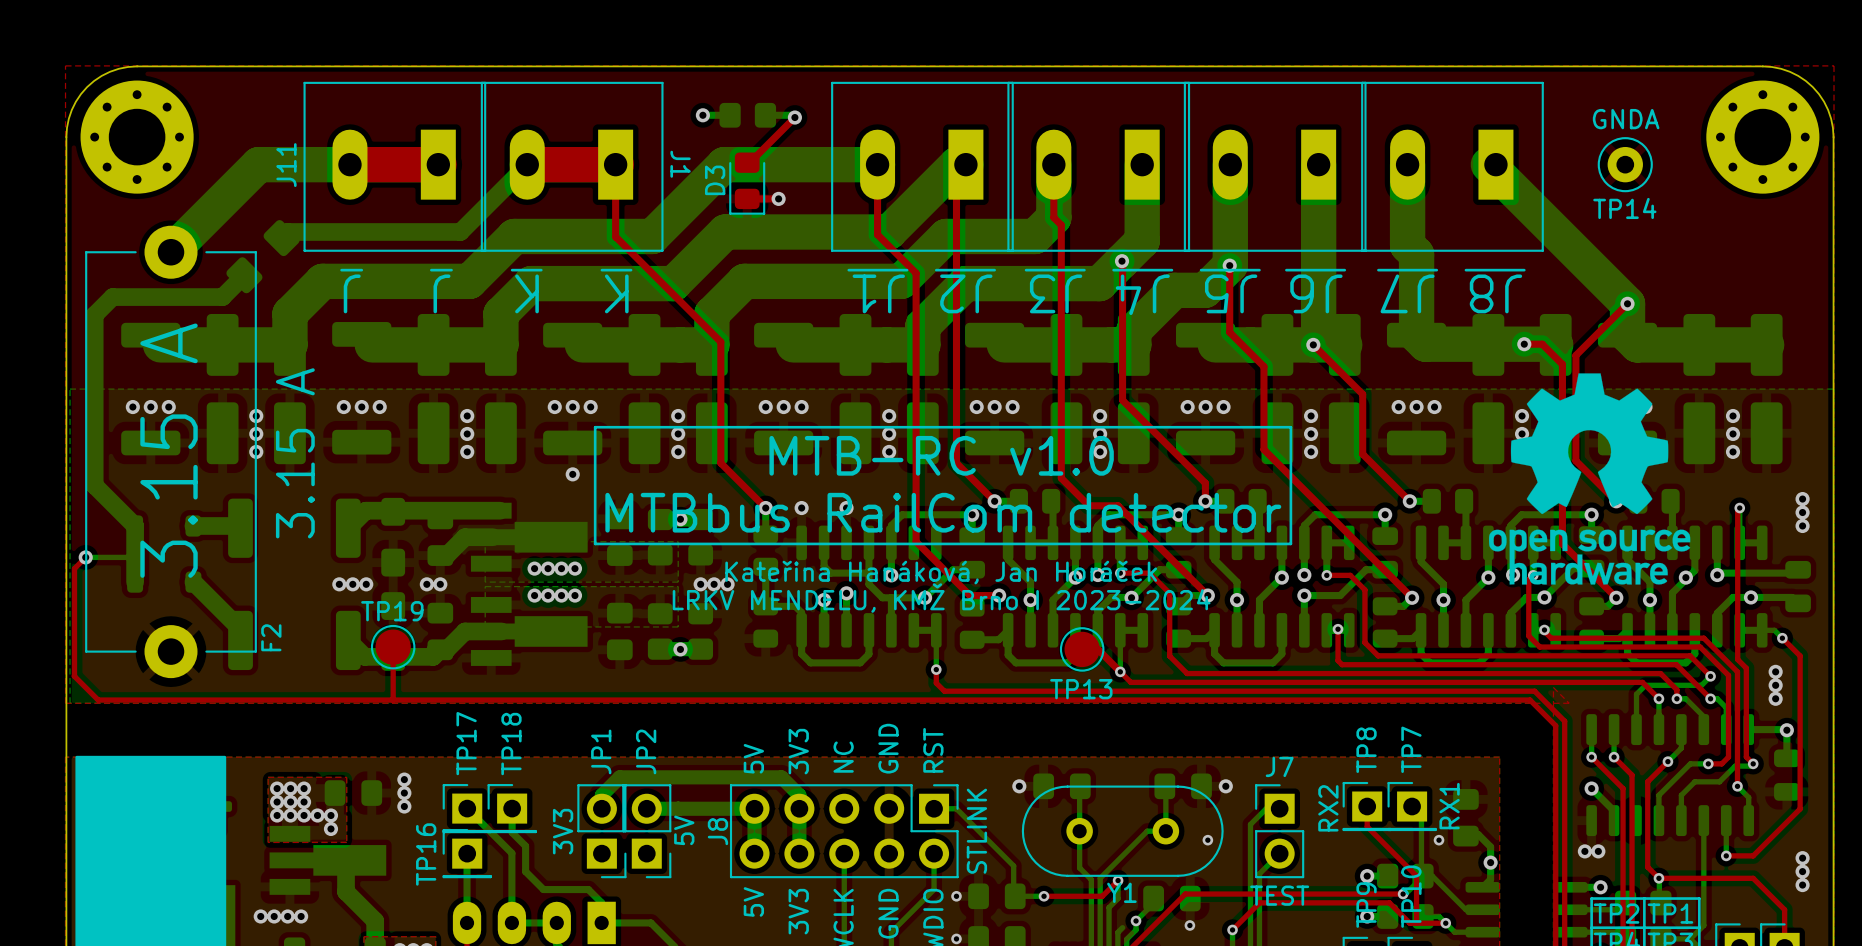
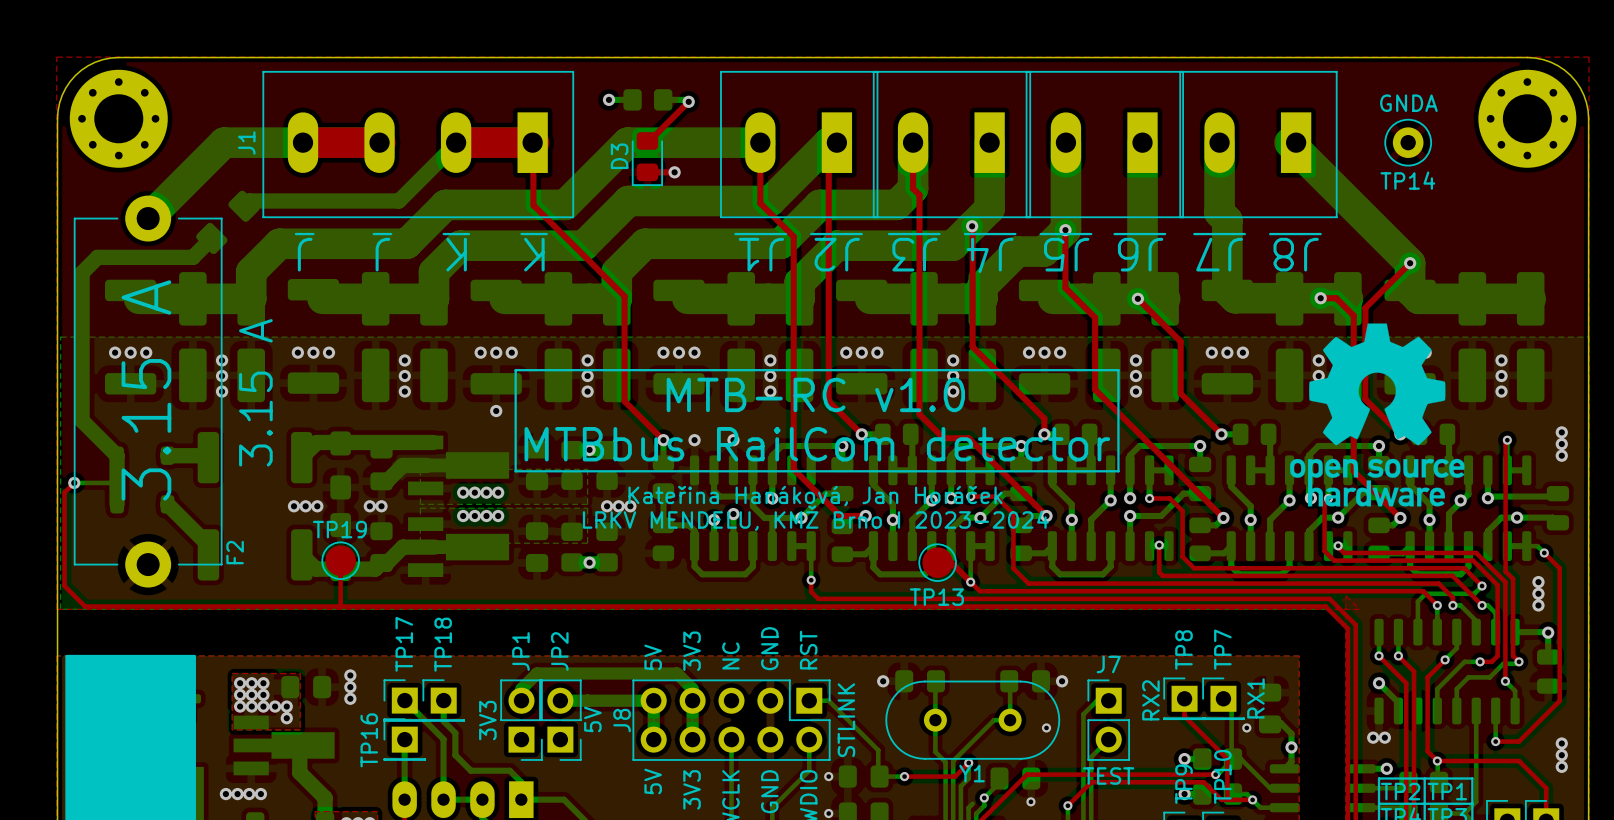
J1 footprint: [480, 81, 664, 252] -> [262, 70, 575, 219]
J1 name position: J1 (680, 164) -> J1 (246, 143)
J11: (394, 166) -> none

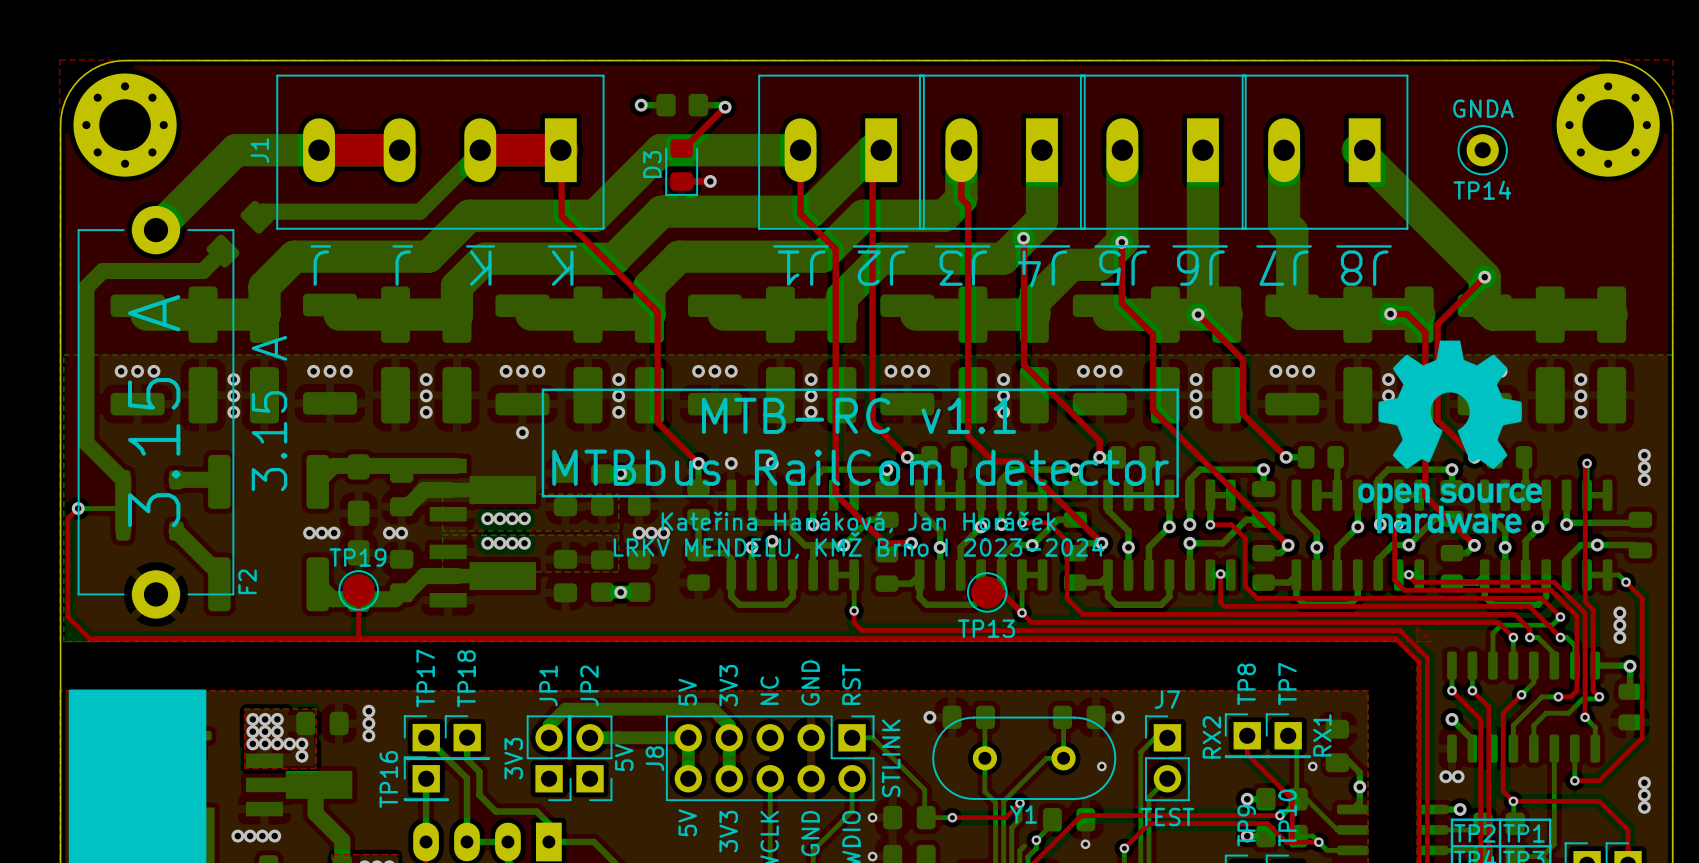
text: MTB-RC v1.0 (815, 394) -> MTB-RC v1.1 (859, 415)

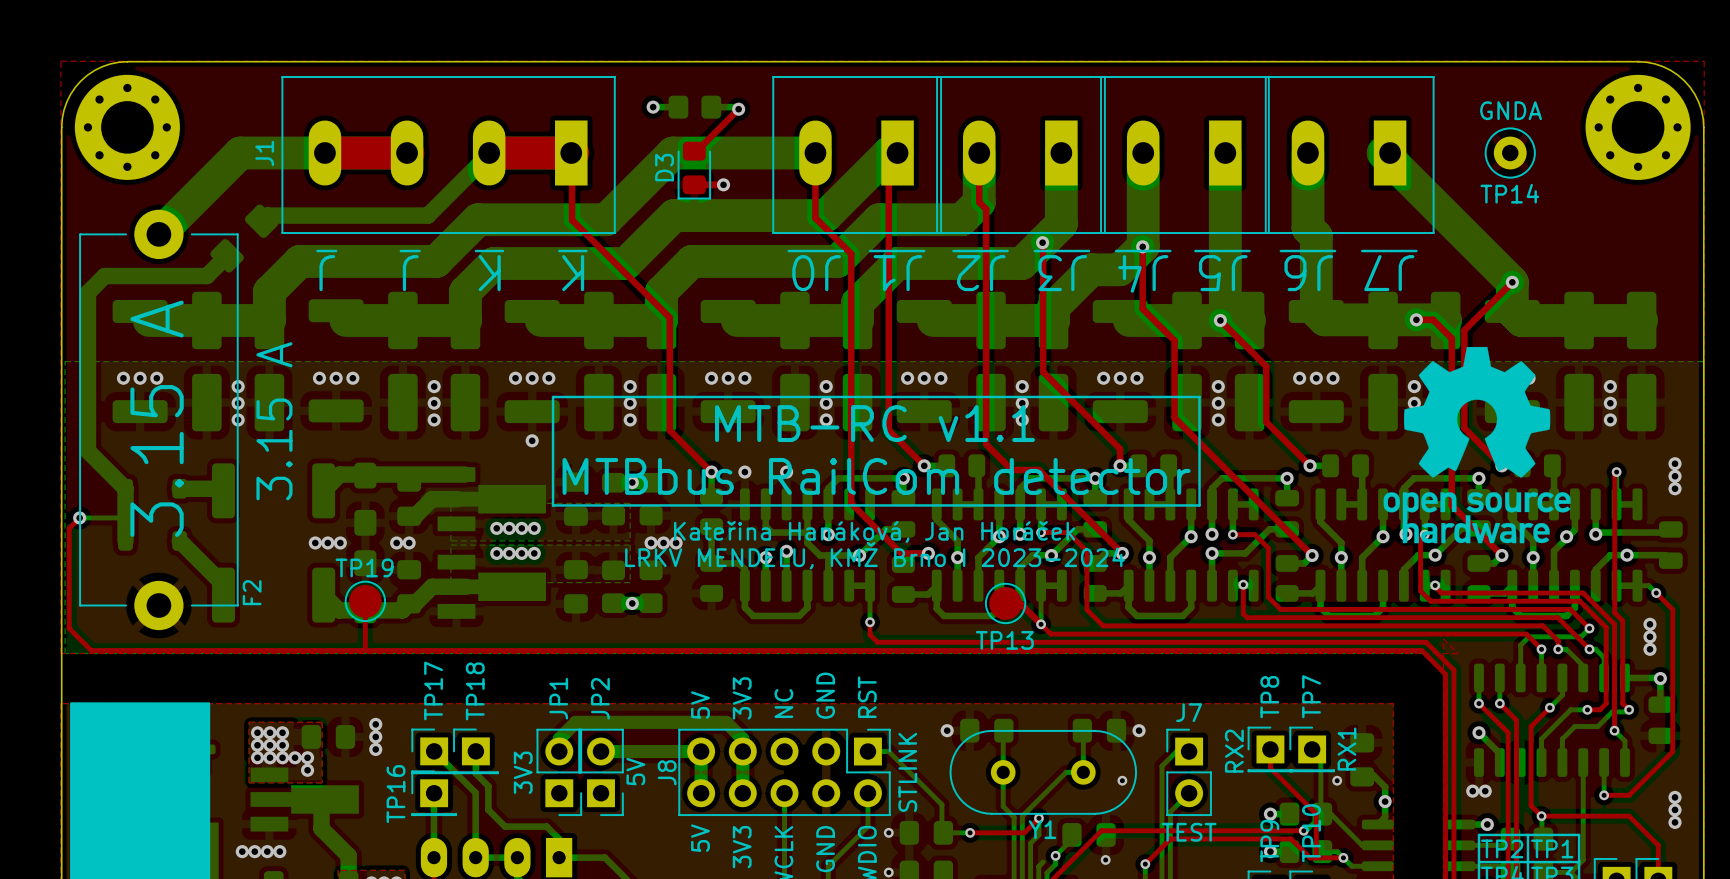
text: J1 (801, 268) -> J0 (816, 273)
text: J2 (881, 268) -> J1 (897, 273)
text: J3 (963, 268) -> J2 (981, 273)
text: J4 (1042, 268) -> J3 (1062, 273)
text: J5 (1123, 268) -> J4 (1143, 273)
text: J6 (1200, 268) -> J5 (1223, 273)
text: J7 (1284, 268) -> J6 (1308, 273)
text: J8 (1364, 268) -> J7 (1389, 273)

